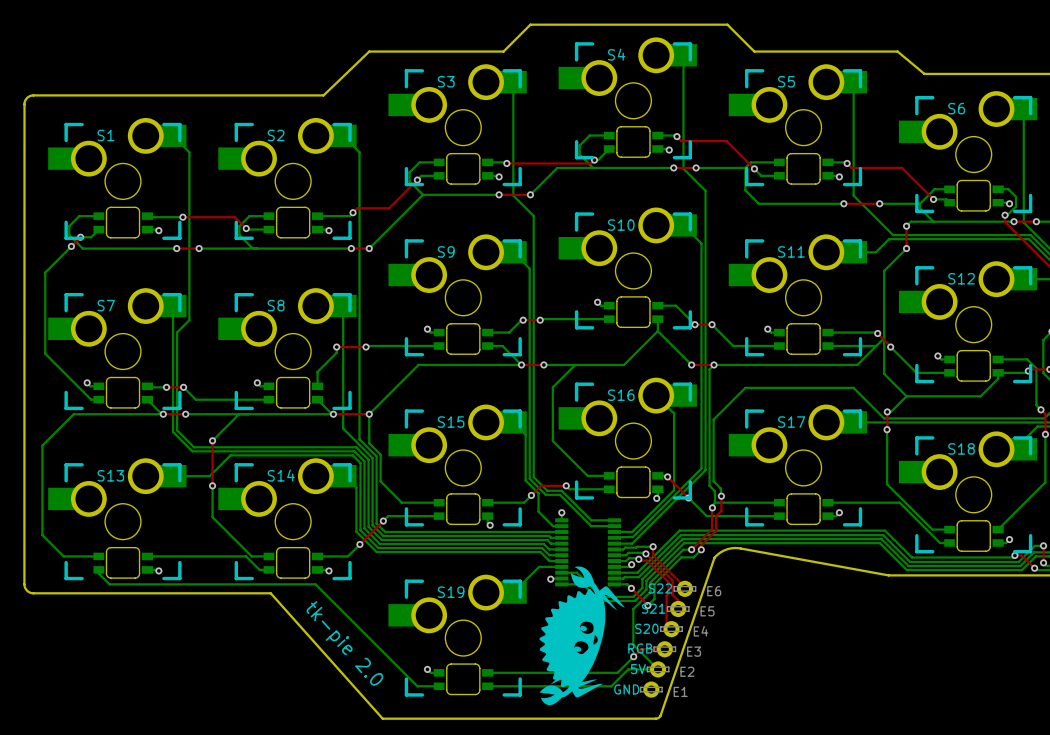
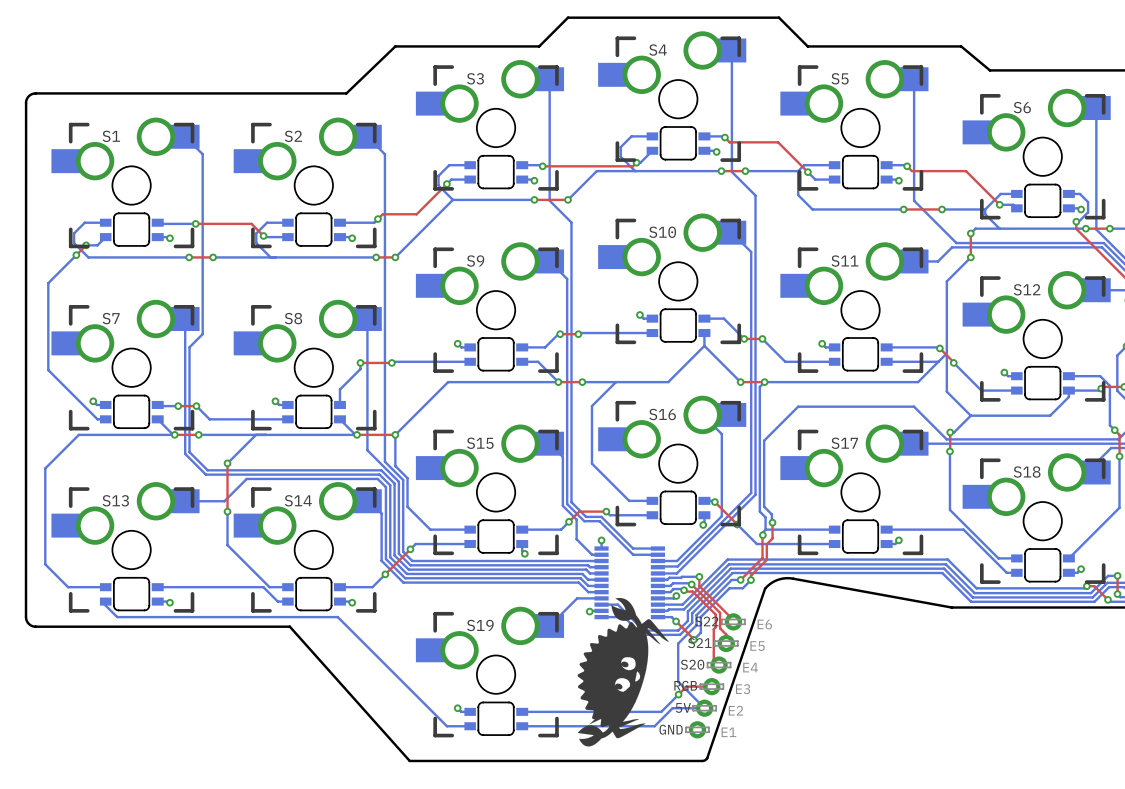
text: tk-pie 2.0 (344, 643) -> none

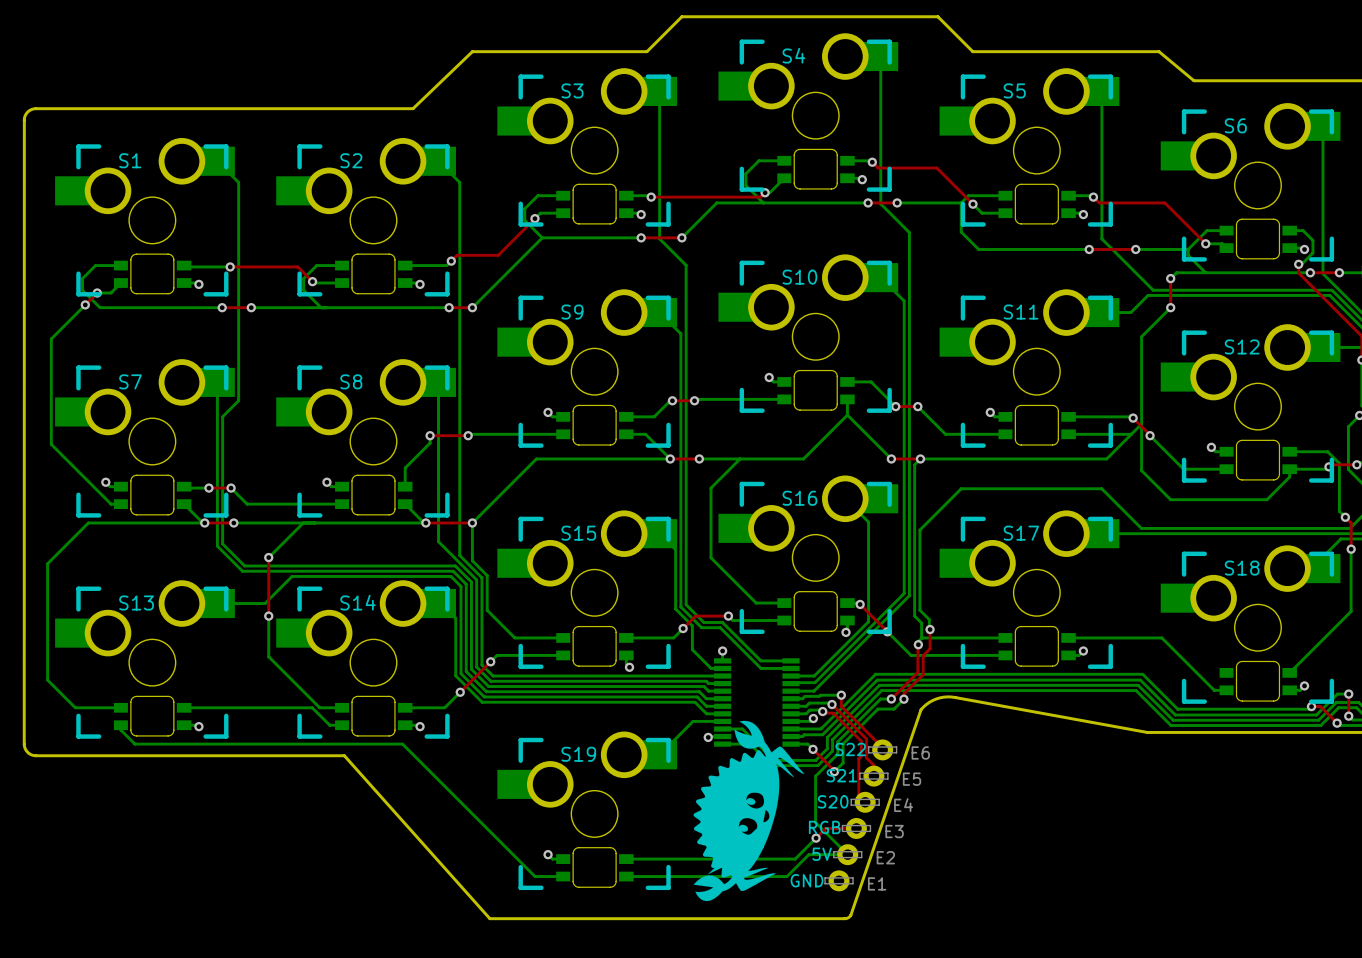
bottom track: (970, 415) (954, 432) (950, 432) -> none
top track: (950, 432) (949, 451) -> none
via: (950, 432) -> none
bottom track: (949, 451) (949, 509) (998, 558) (1016, 558) -> none
via: (949, 451) -> none

